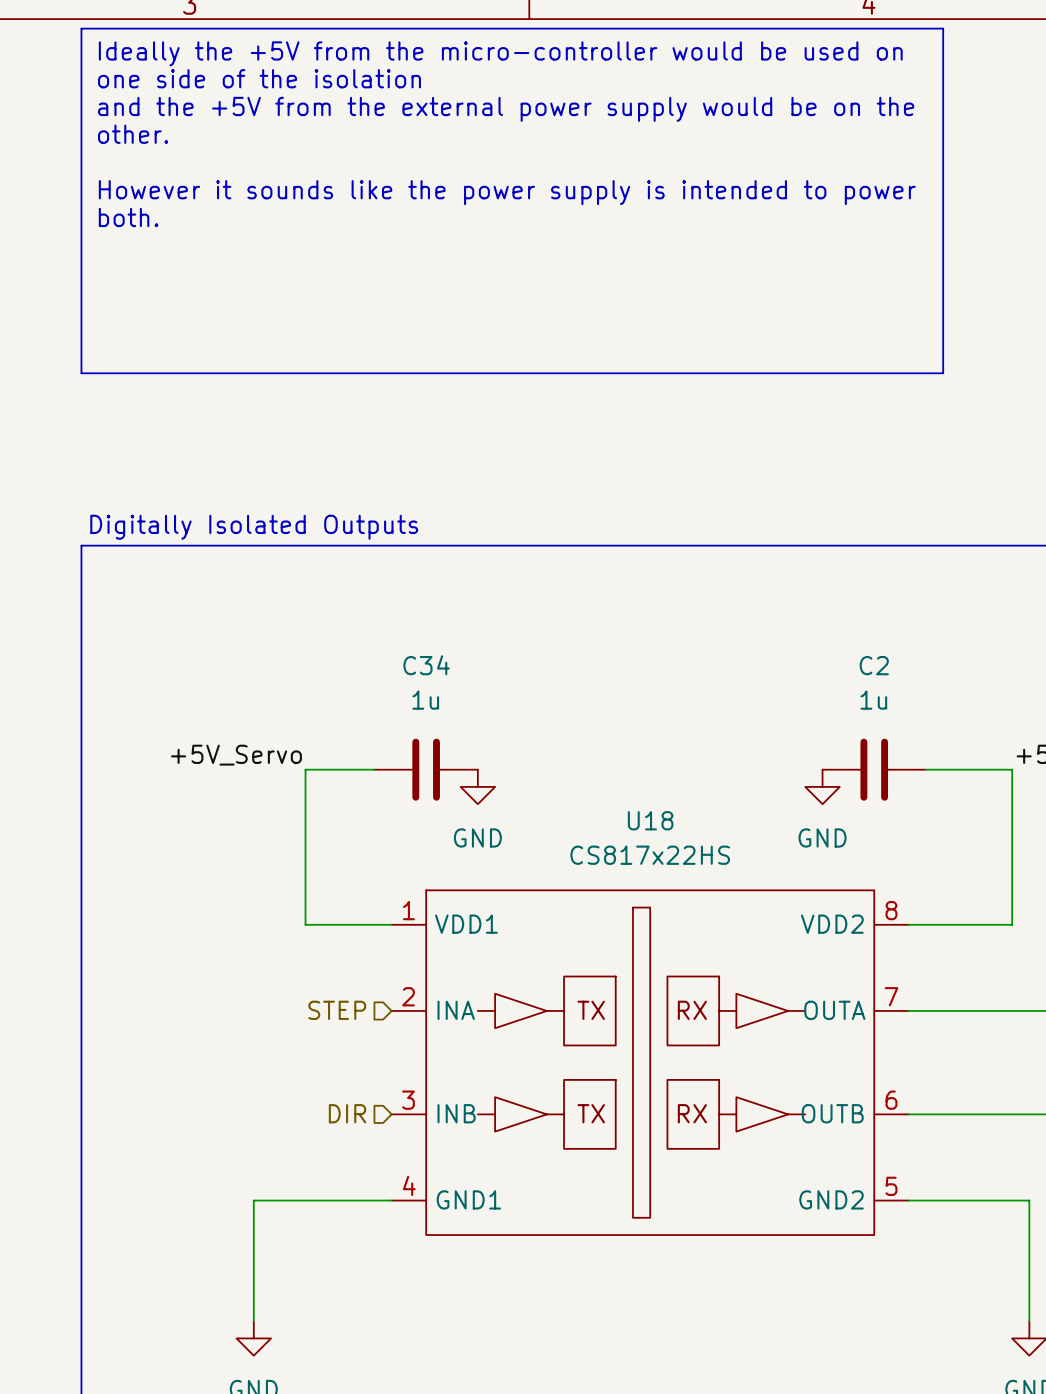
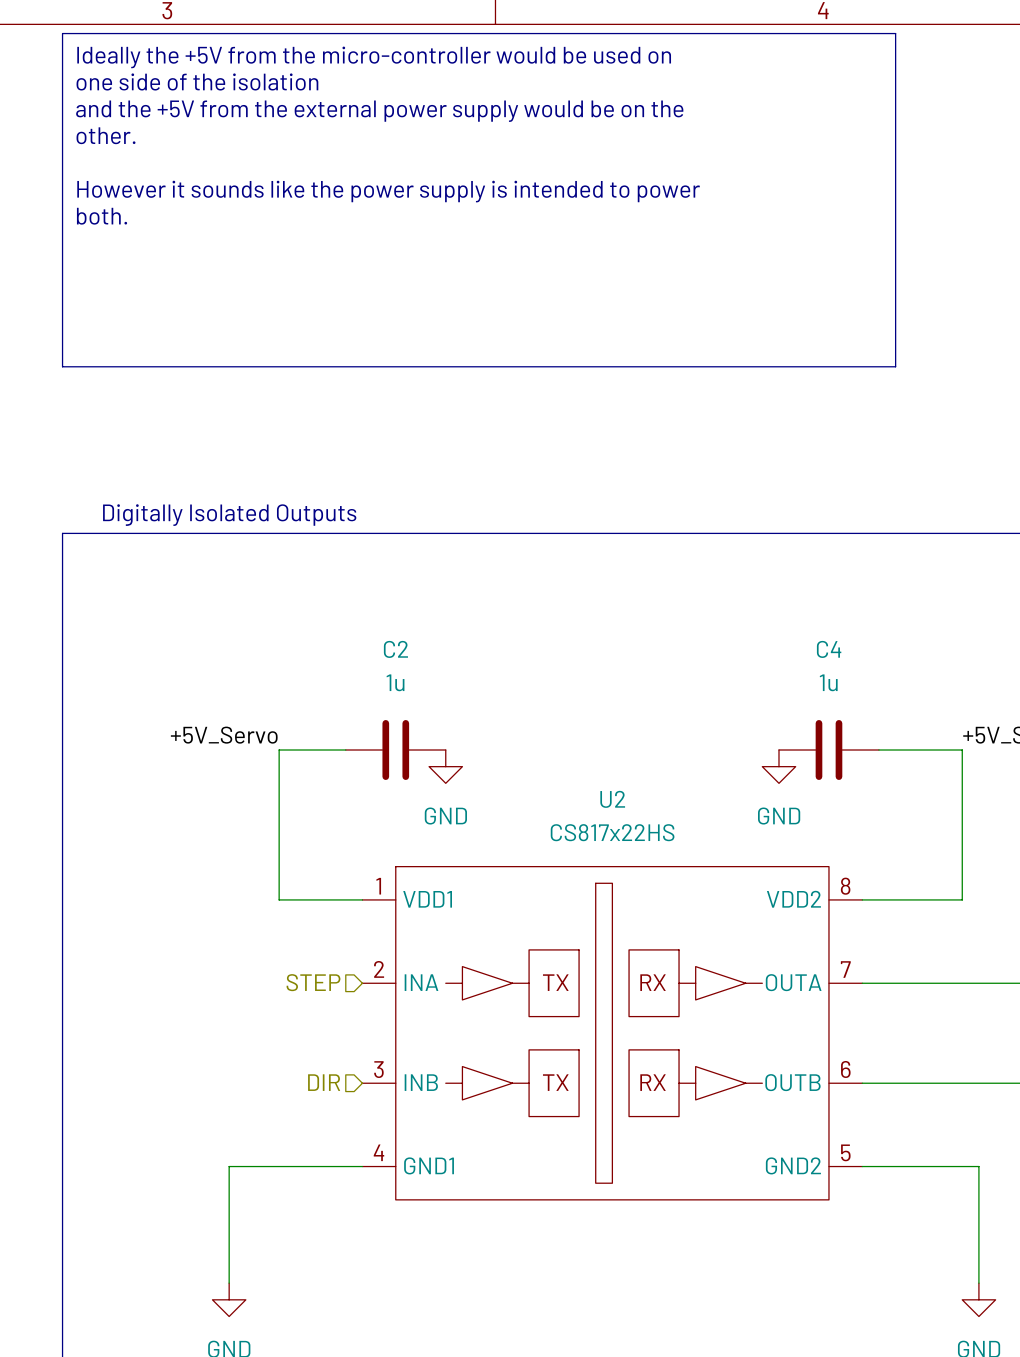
C34 name: C34 (426, 665) -> C2 (395, 649)
C2 name: C2 (874, 665) -> C4 (829, 649)
U18 name: U18 (650, 820) -> U2 (612, 799)

